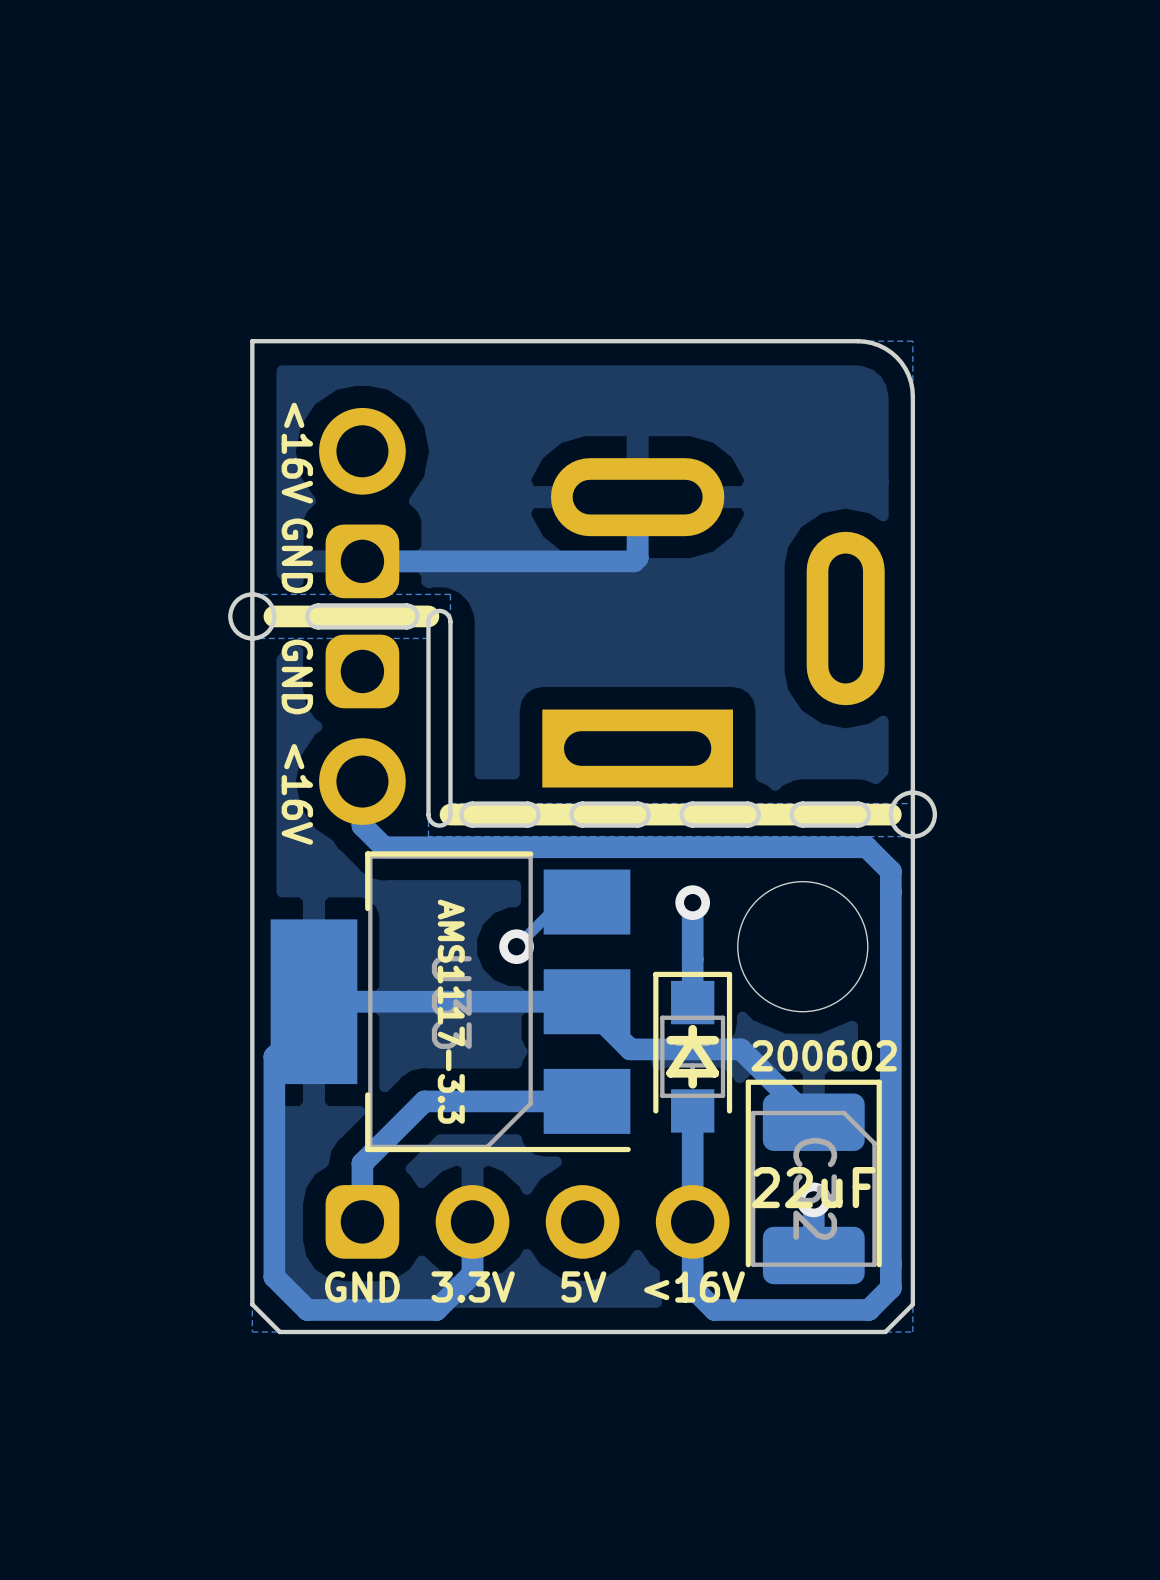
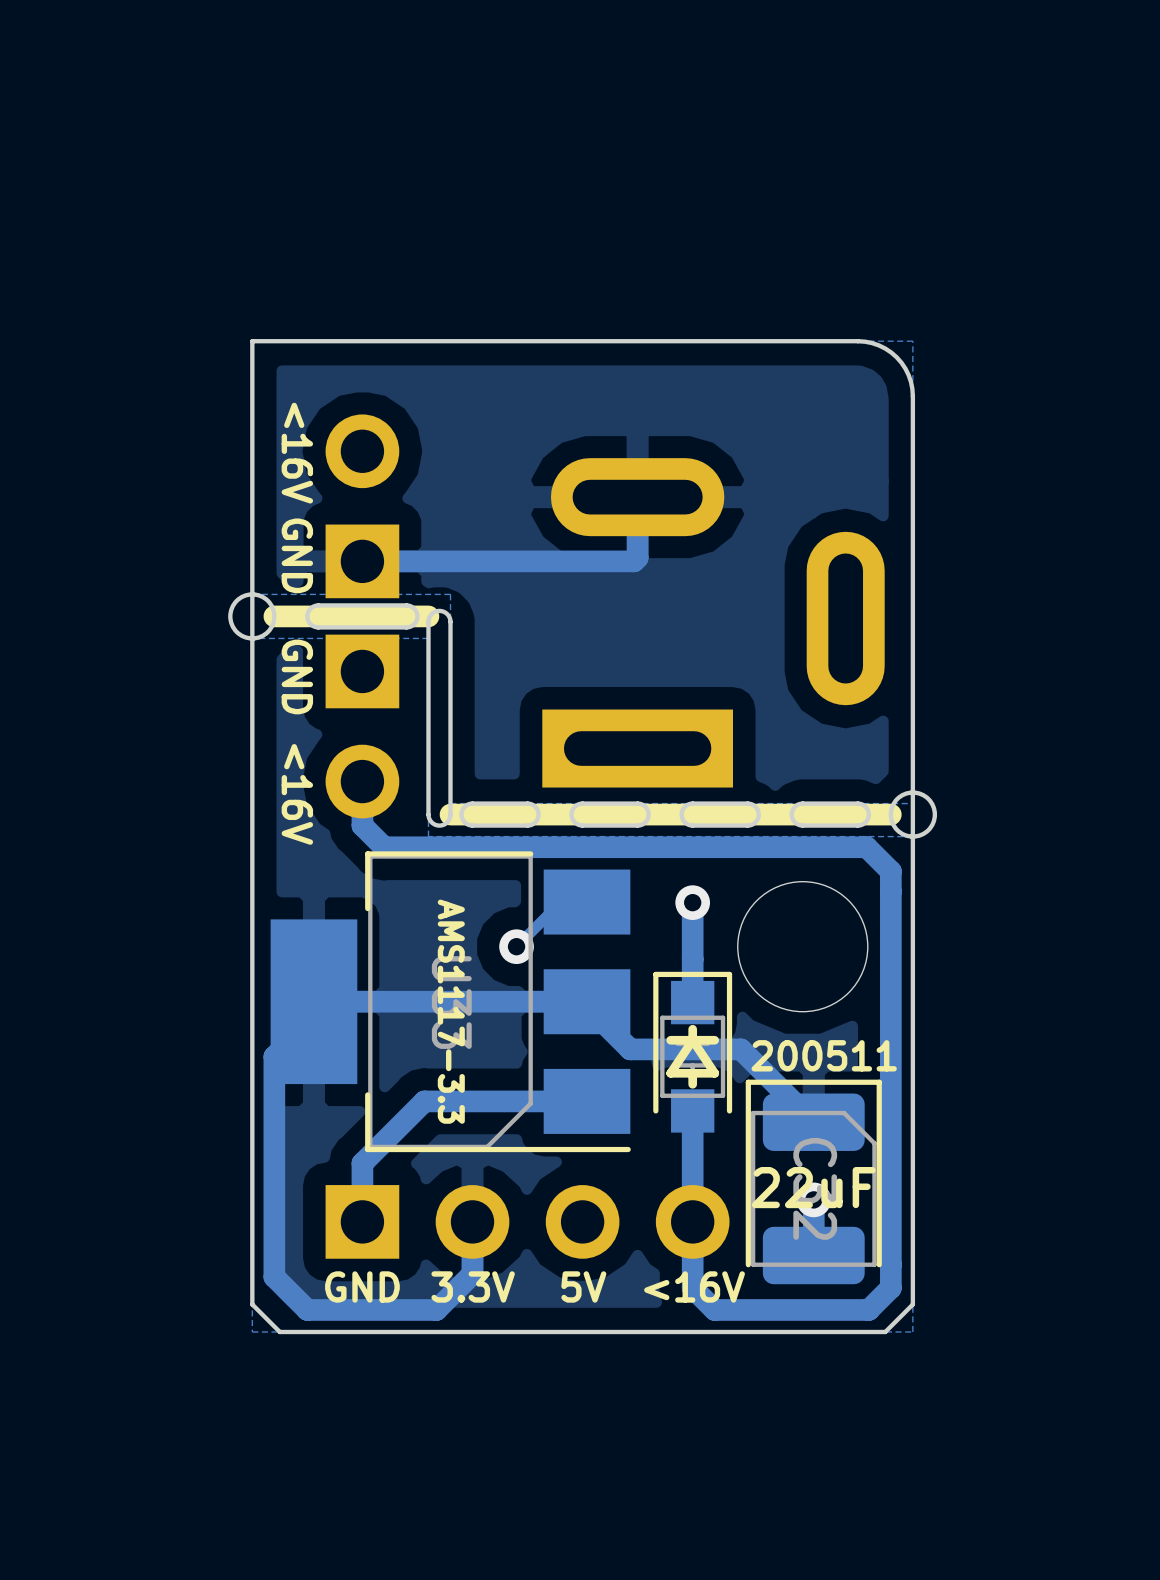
part footprint: [319, 407, 406, 599] -> [325, 414, 400, 599]
part footprint: [319, 634, 406, 825] -> [325, 634, 400, 819]
text: 200602 (824, 1055) -> 200511 (824, 1055)
part footprint: [325, 1185, 730, 1259] -> [325, 1185, 730, 1259]

